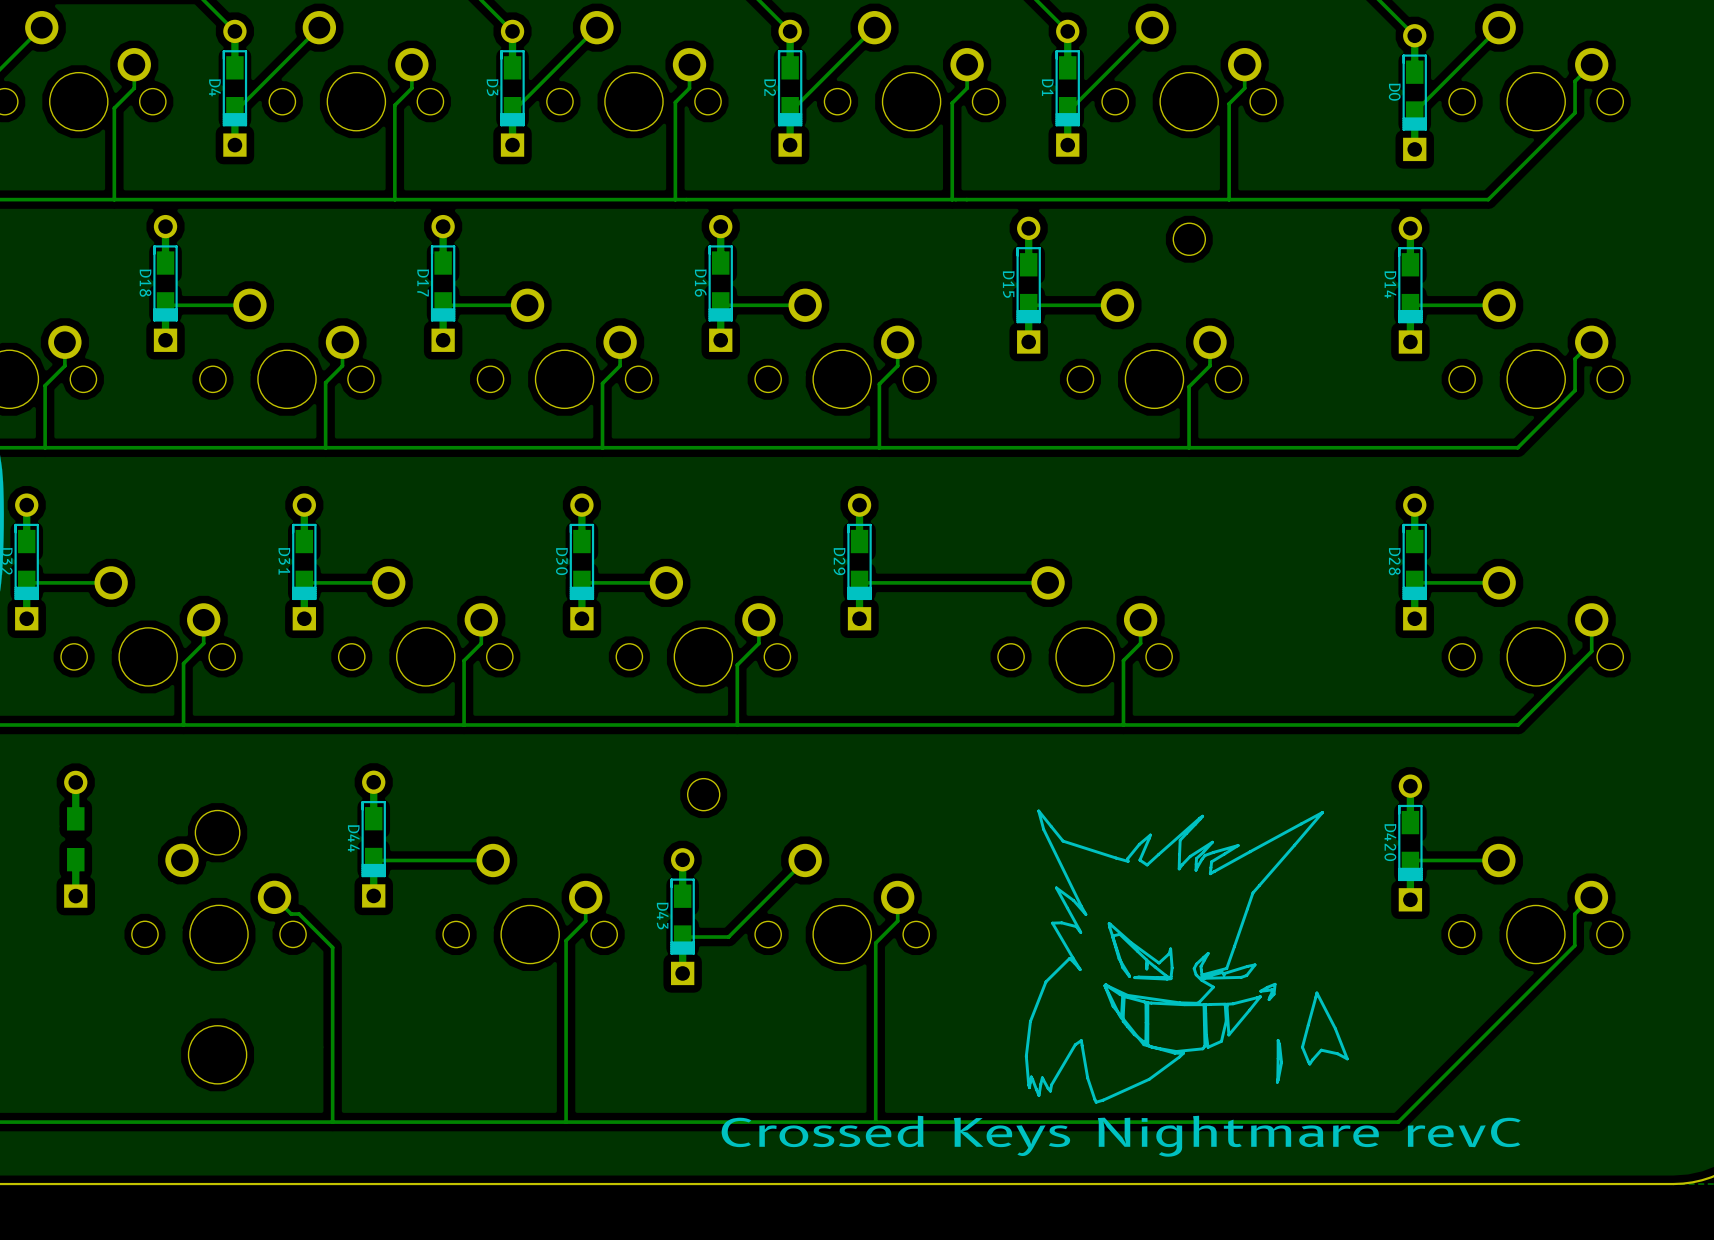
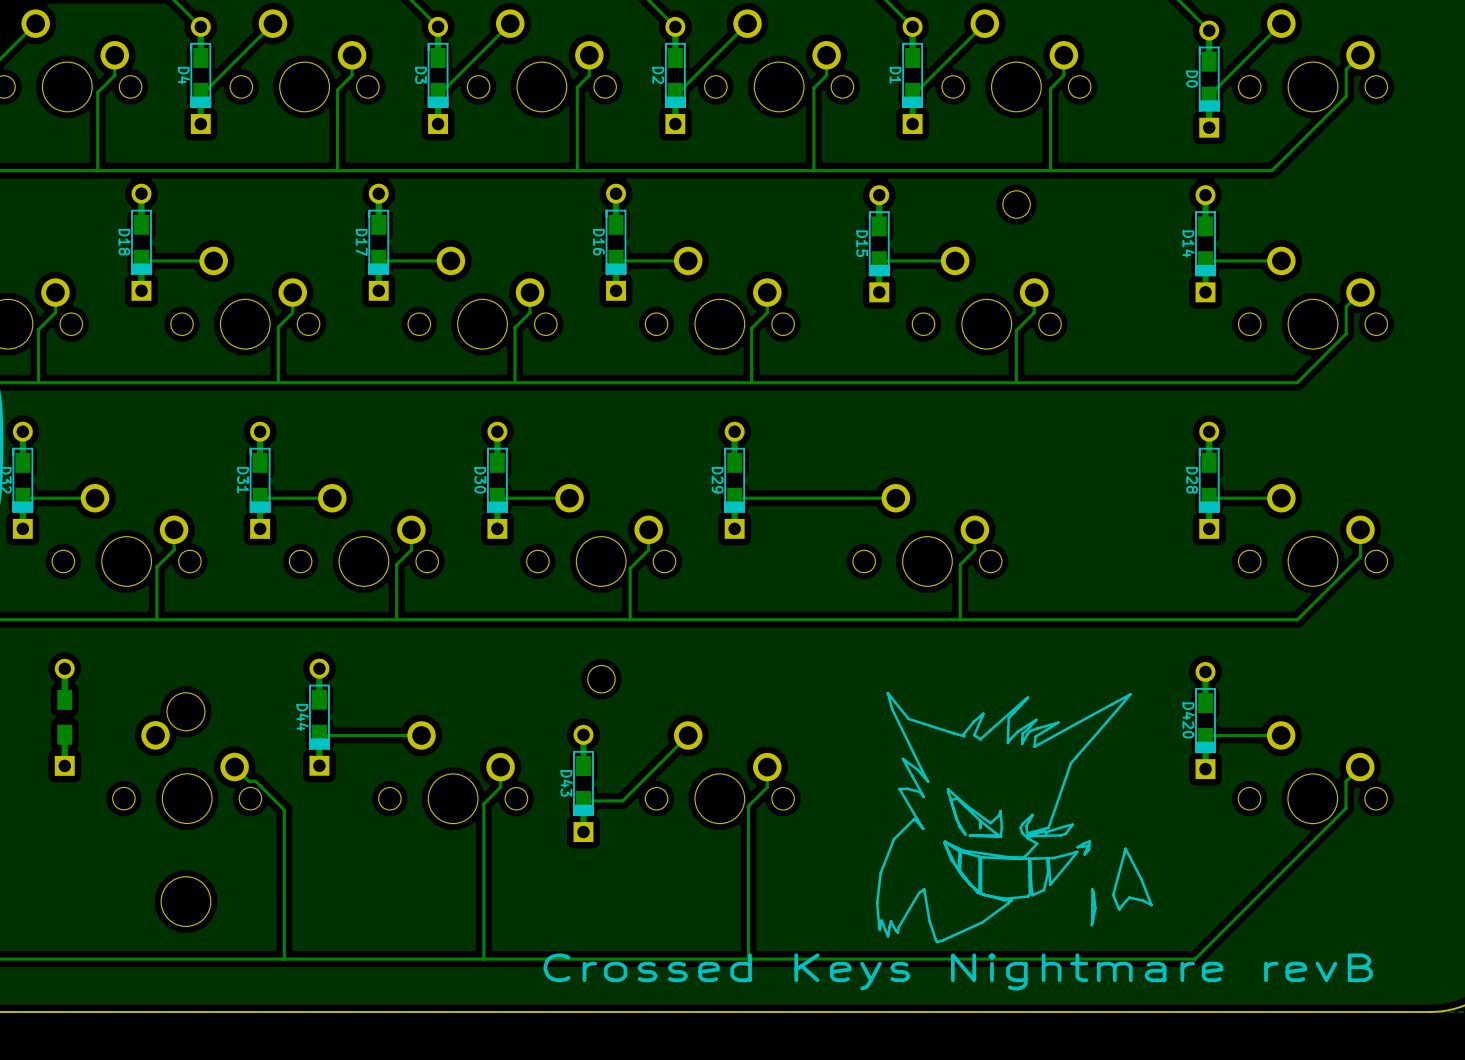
text: Crossed Keys Nightmare revC (1121, 1136) -> Crossed Keys Nightmare revB (958, 971)

